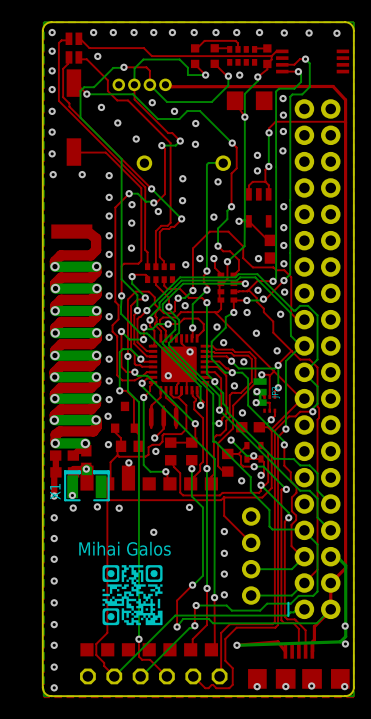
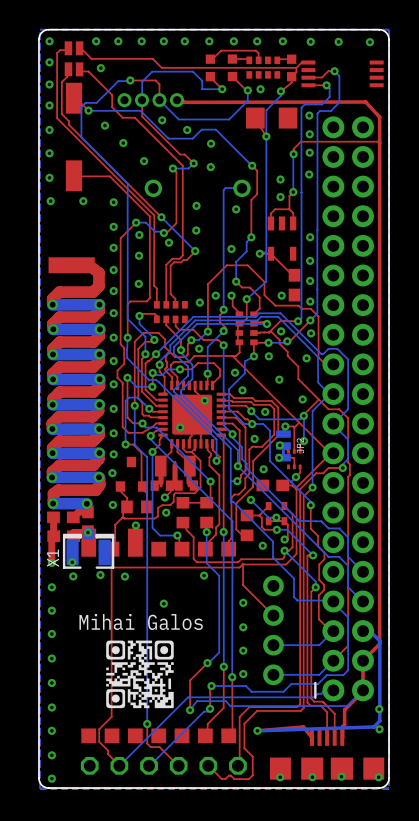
part: none -> (175, 466)
part: none -> (162, 485)
part: none -> (186, 485)

